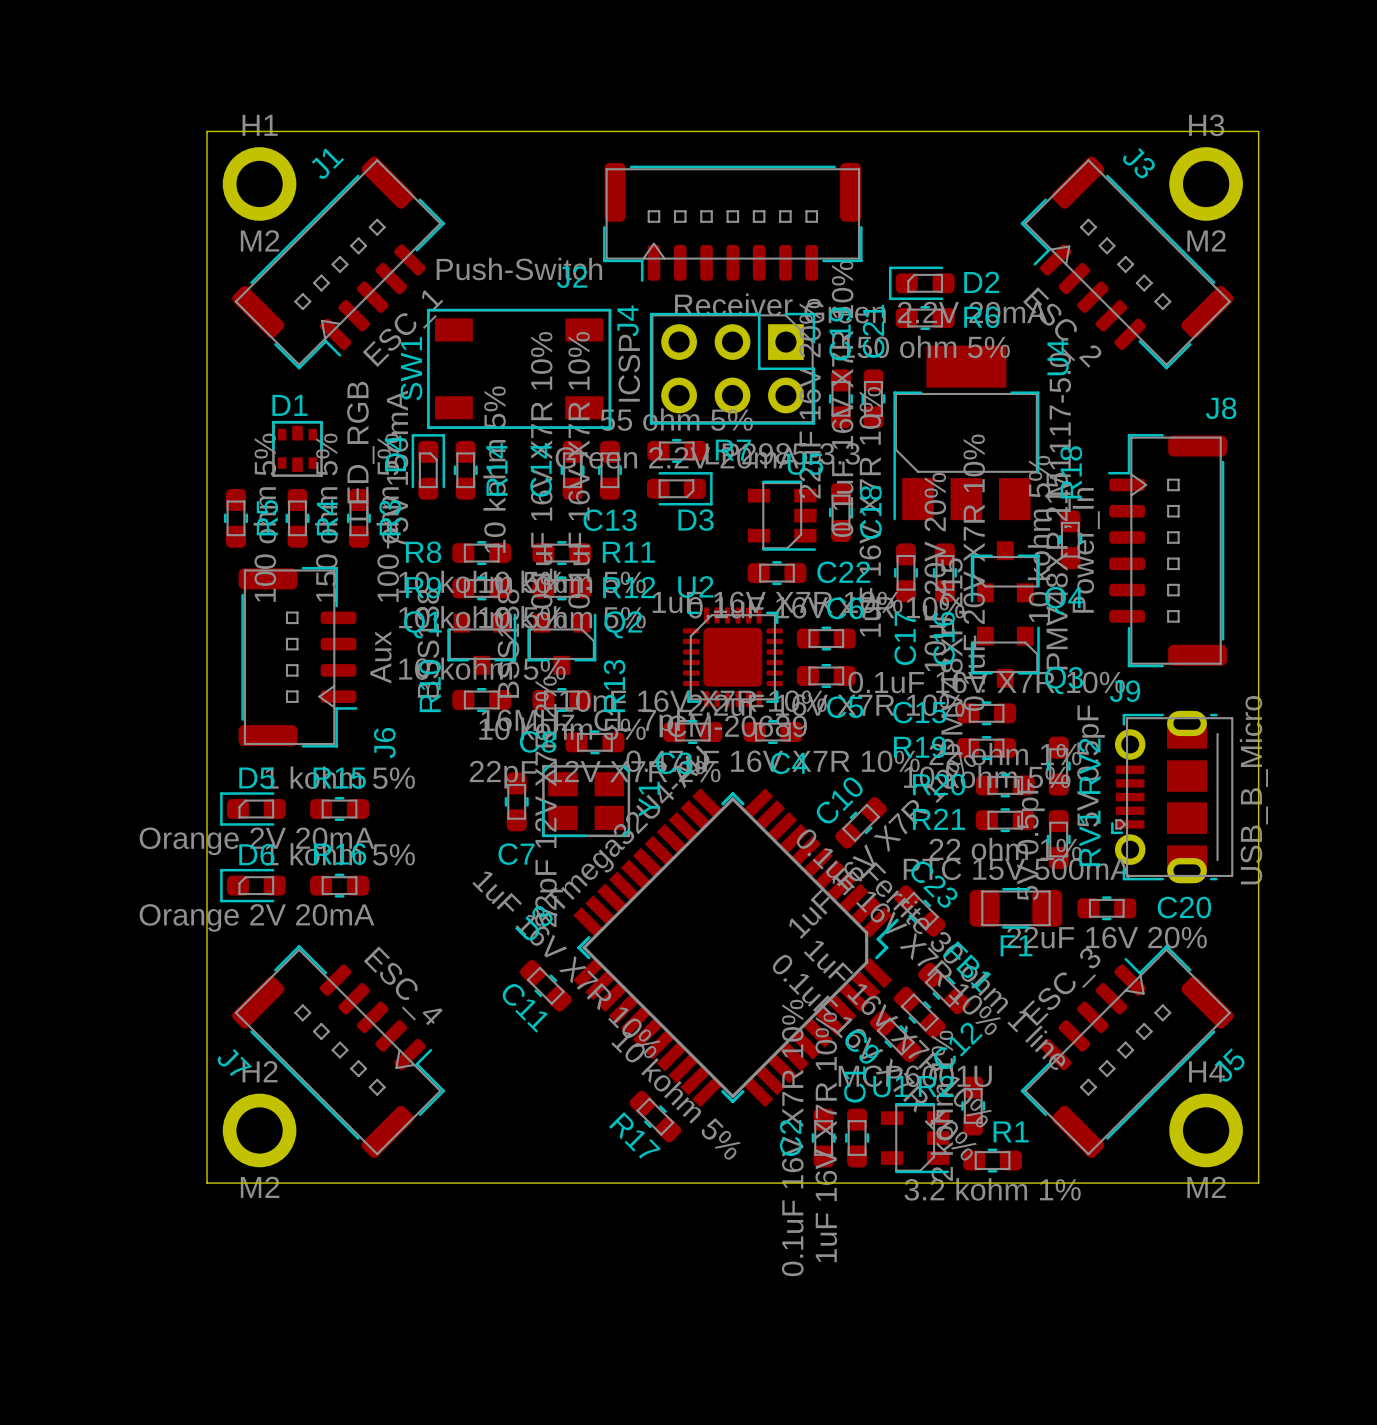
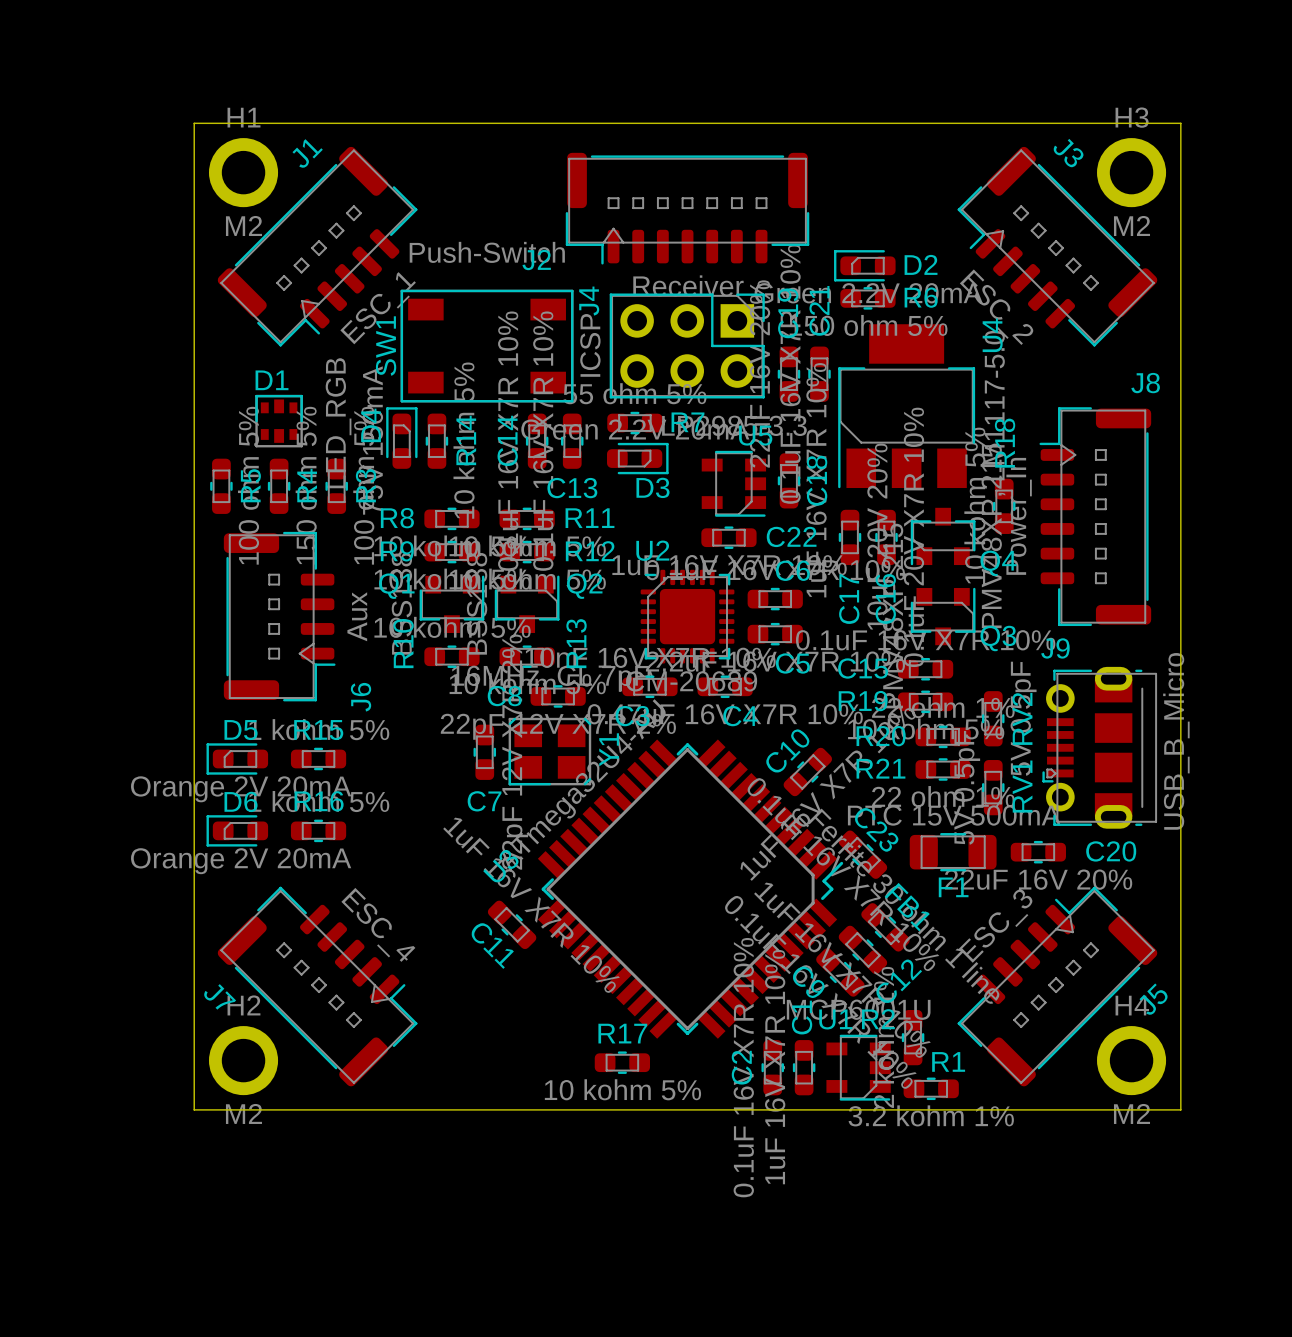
R17 value position: 10 kohm 5% (676, 1095) -> 10 kohm 5% (622, 1089)
R17 rotation: 0° (655, 1116) -> 45° counterclockwise (622, 1062)
R17 name position: R17 (634, 1135) -> R17 (622, 1033)

